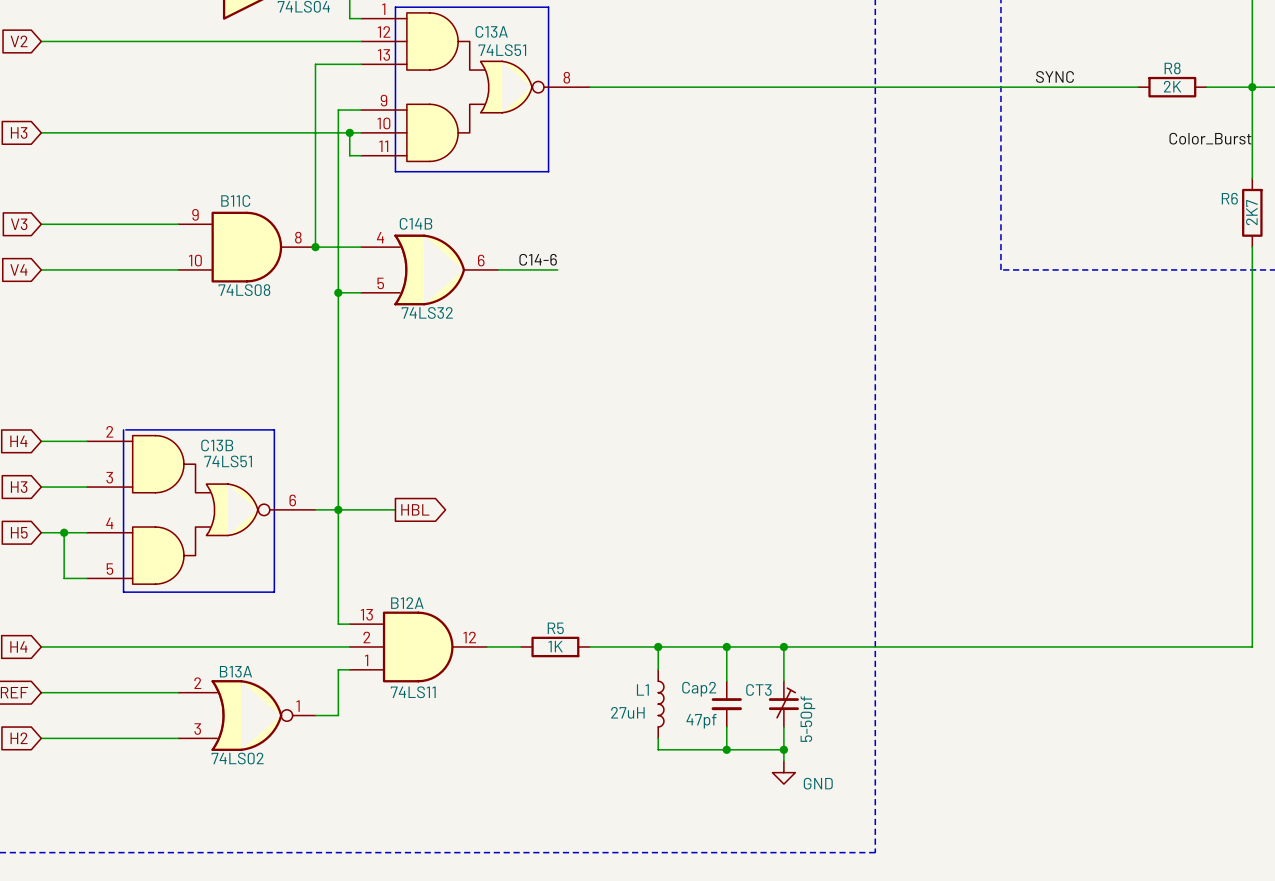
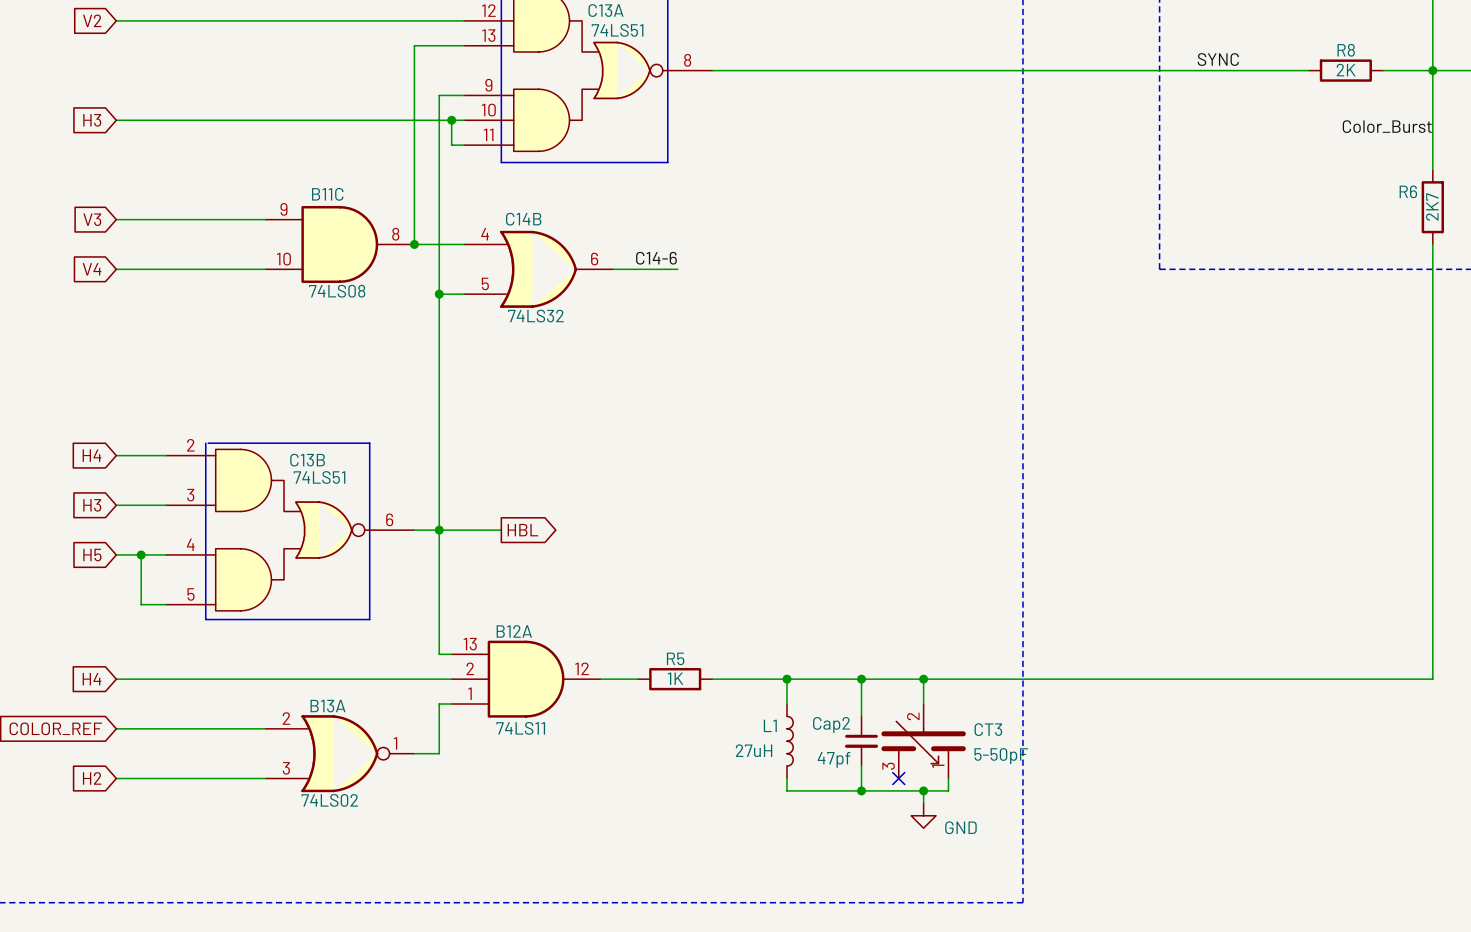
CT3 symbol: [768, 681, 799, 727] -> [881, 704, 966, 779]
CT3 name position: CT3 (758, 689) -> CT3 (988, 729)
CT3 value: 5-50pf (807, 719) -> 5-50pF (1001, 756)
wire: (783, 726) (783, 749) -> (948, 778) (948, 790) (923, 790)
no-connect mark: none -> (898, 778)

